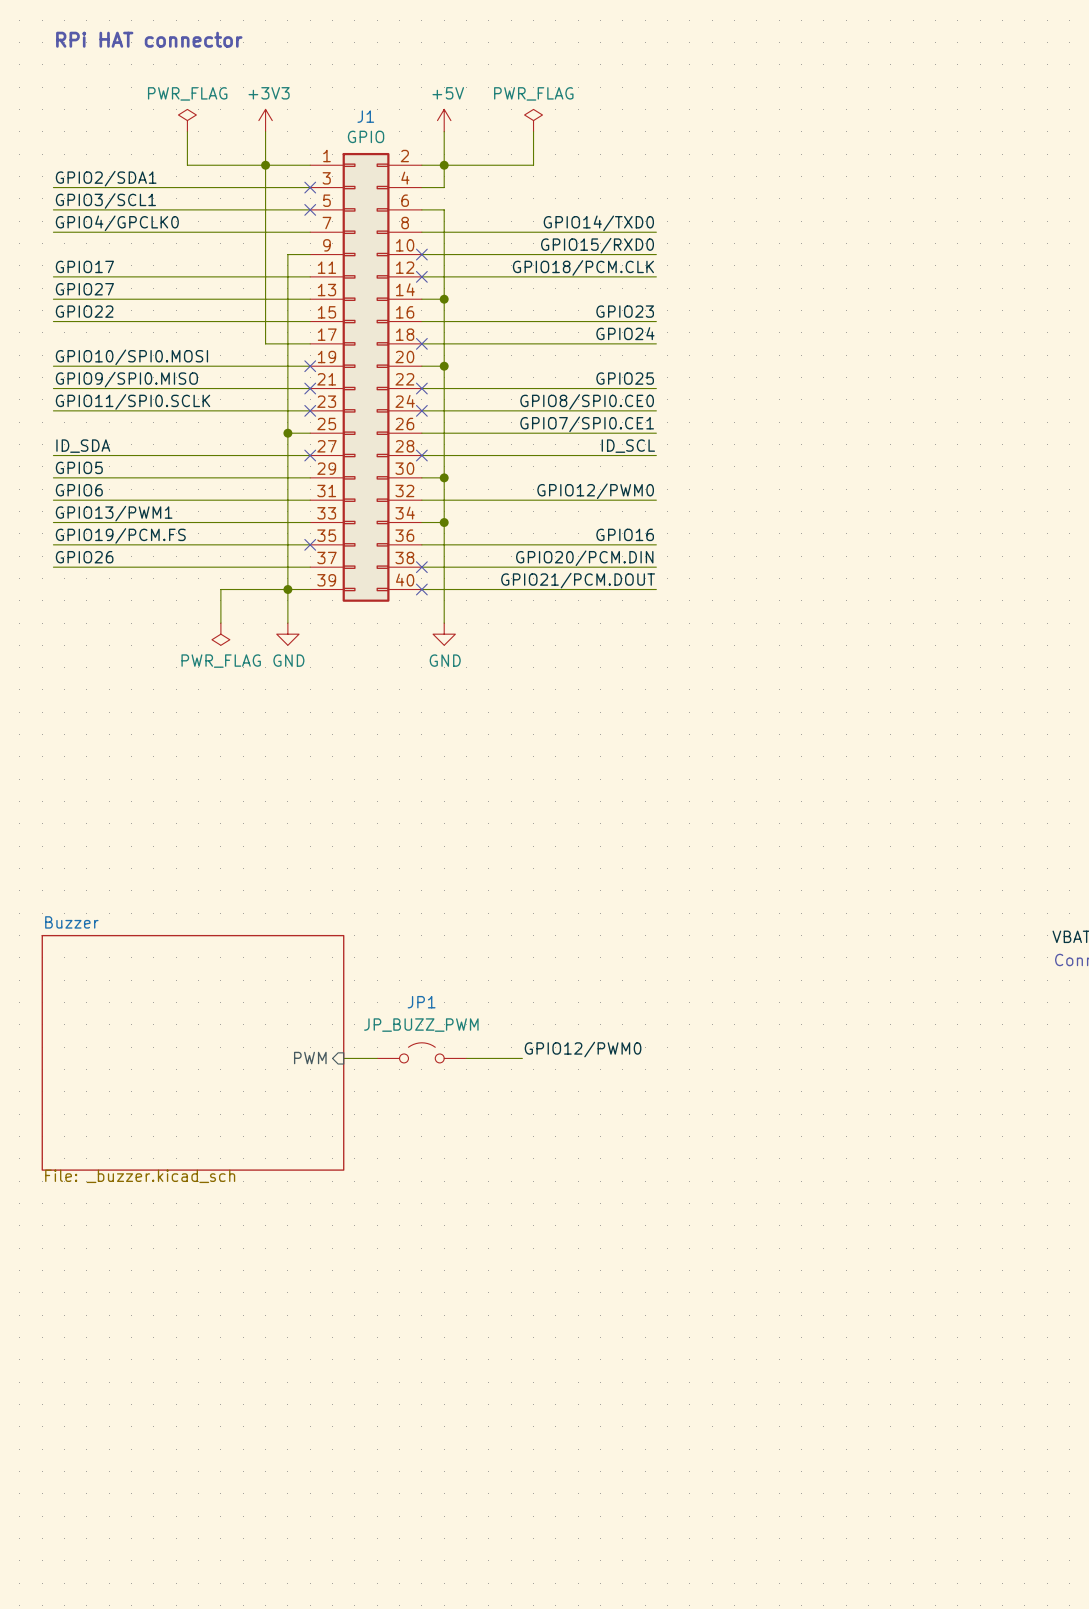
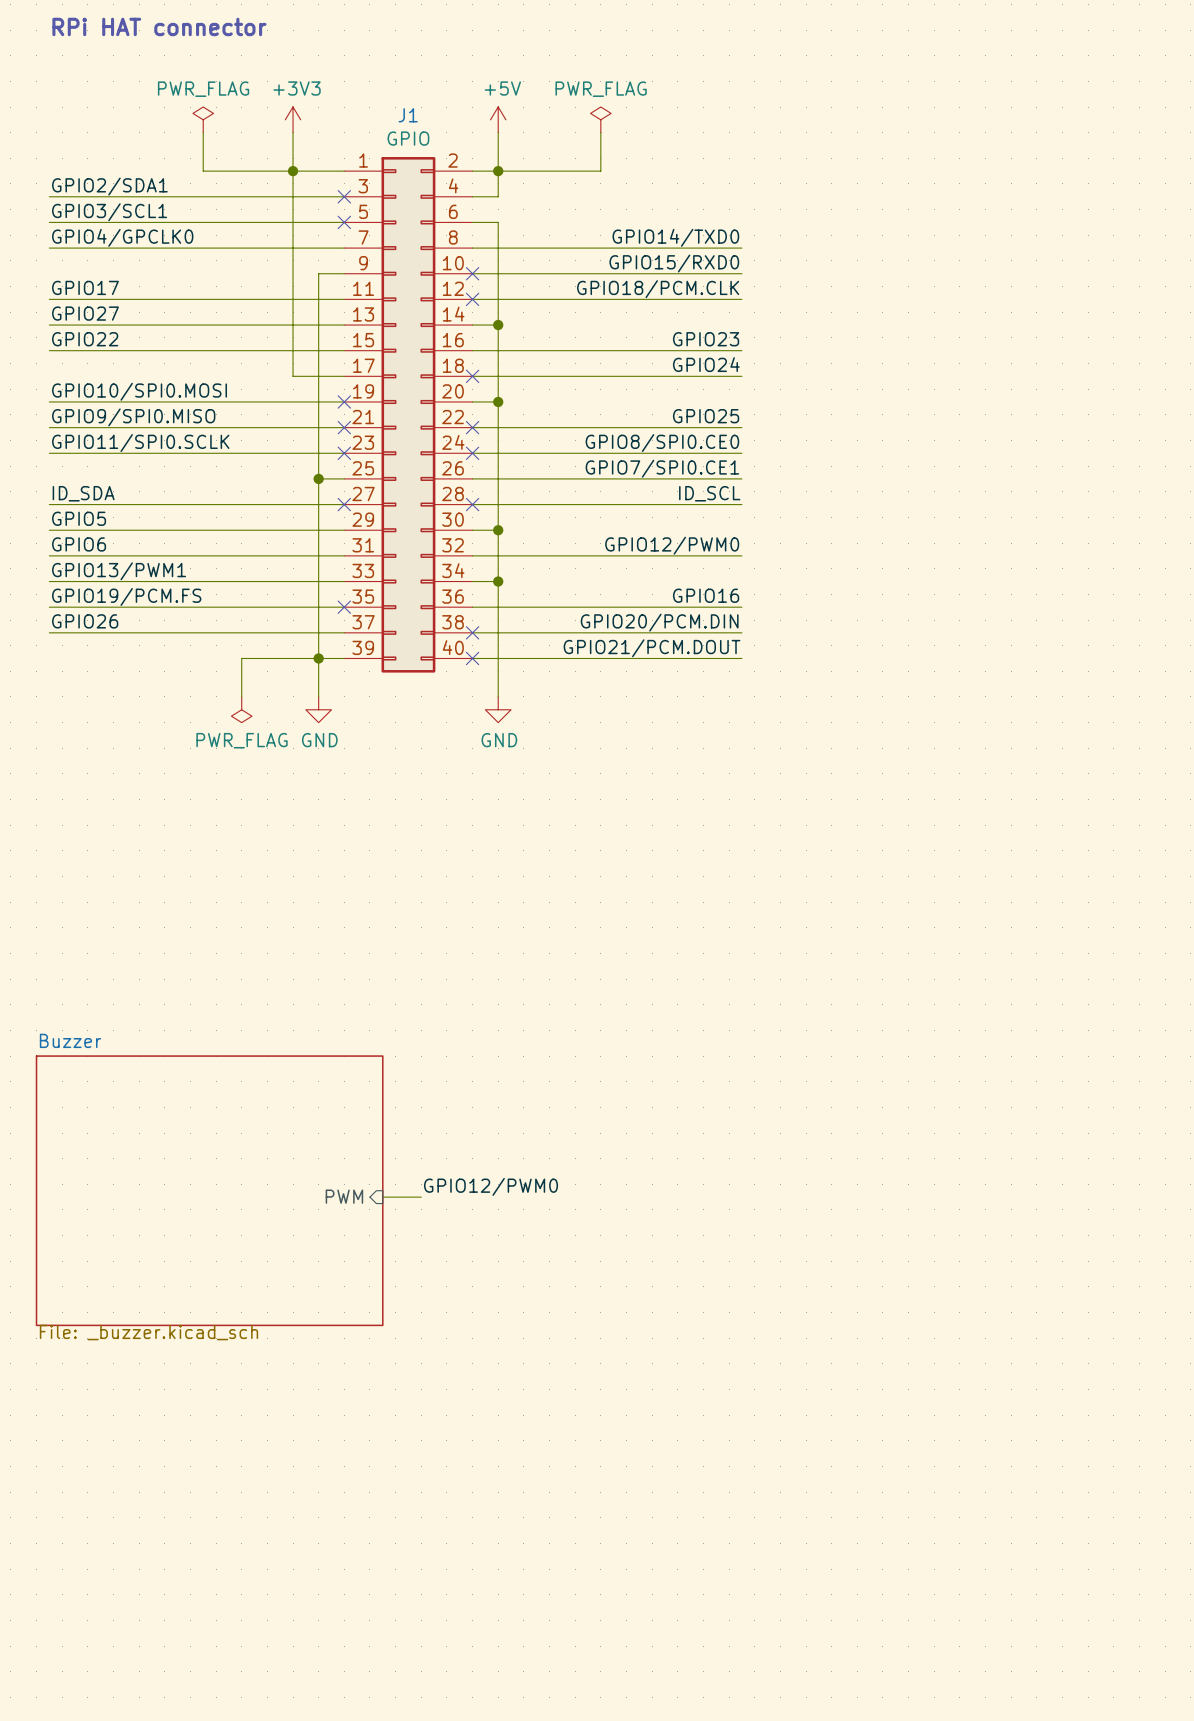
label position: GPIO12/PWM0 (583, 1049) -> GPIO12/PWM0 (490, 1186)
JP1: JP_BUZZ_PWM (421, 1052) -> none
wire: (466, 1058) (522, 1058) -> none

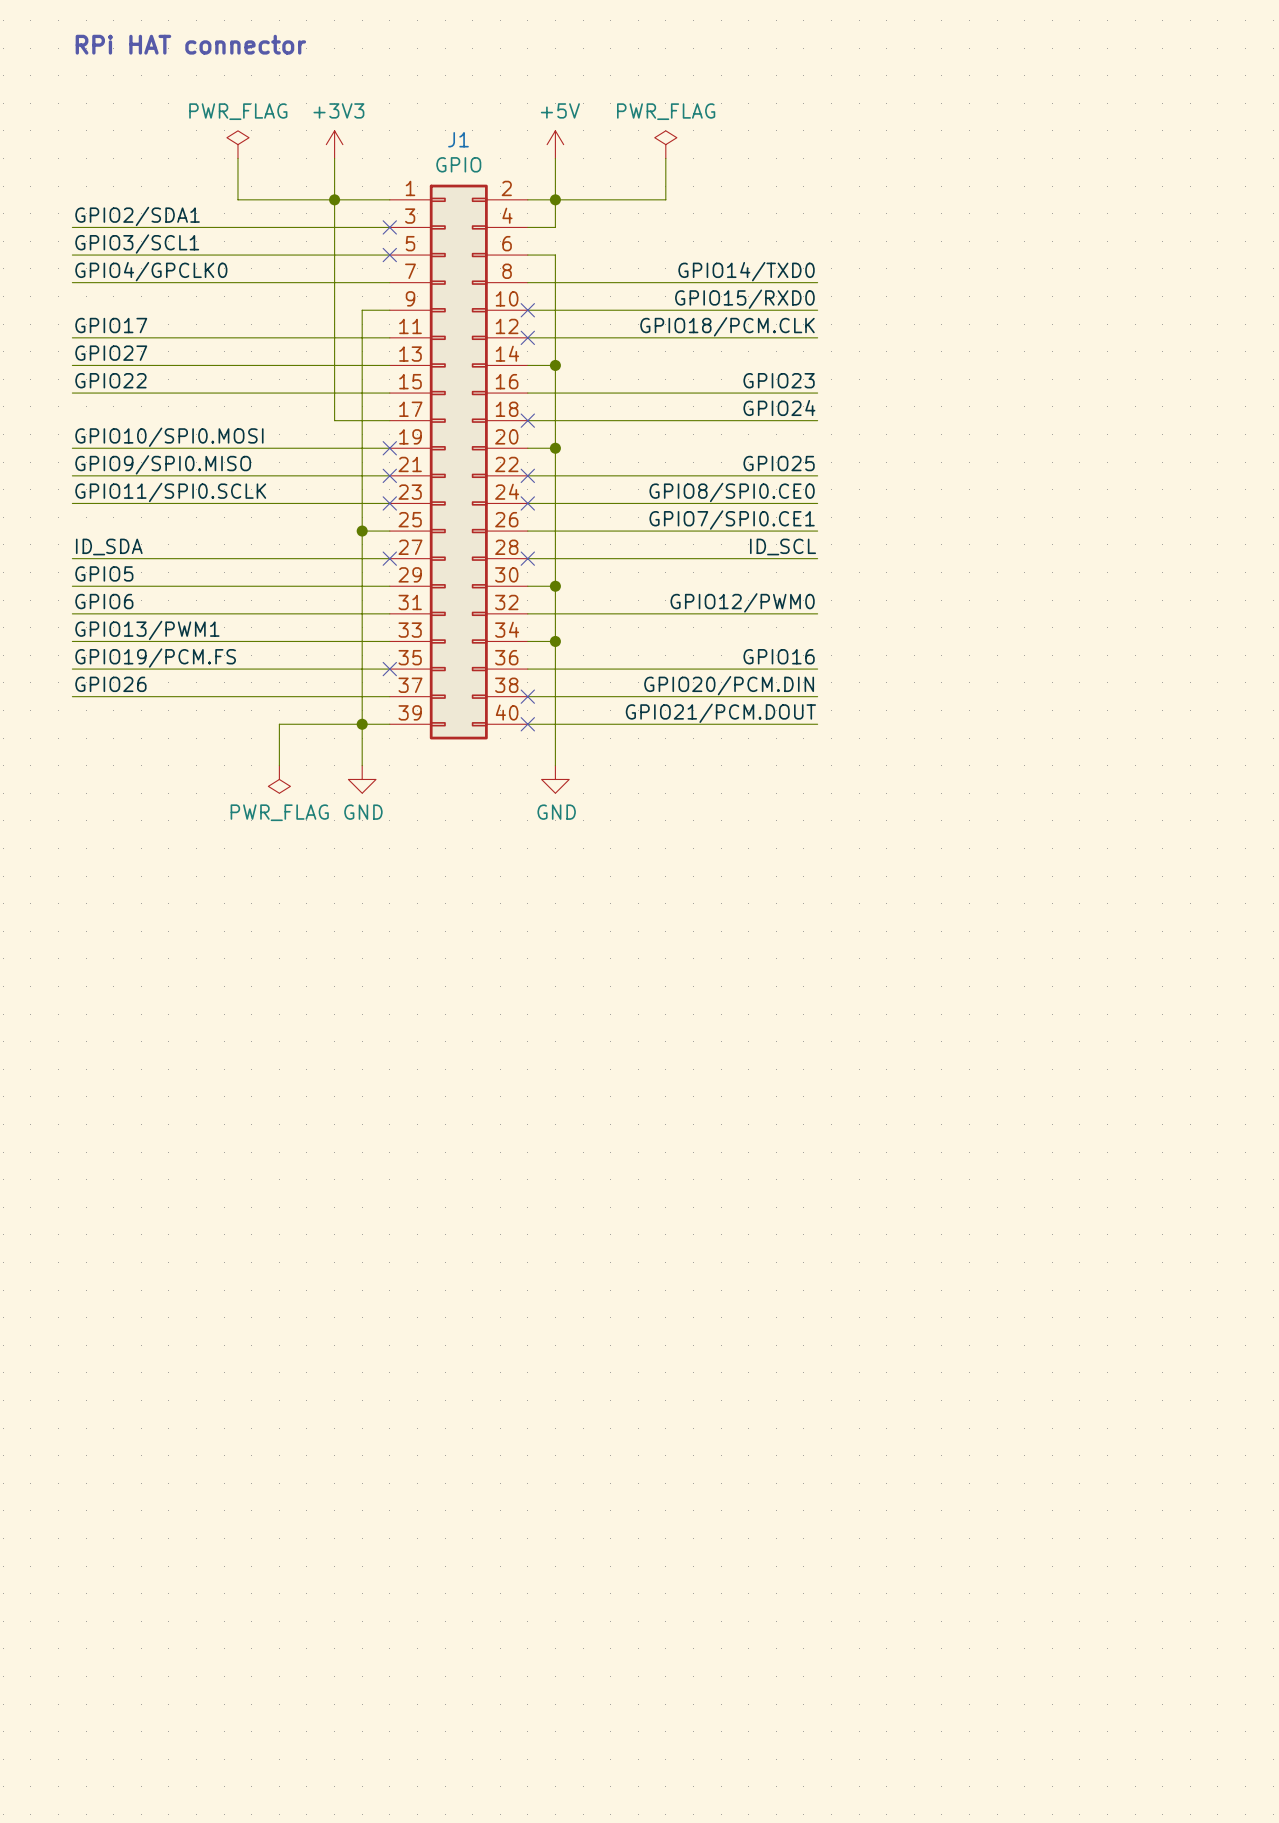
label: GPIO12/PWM0 (490, 1186) -> none
sheet Buzzer: File: _buzzer.kicad_sch (209, 1190) -> none
sheet pin: PWM (344, 1196) -> none
wire: (382, 1197) (421, 1197) -> none

